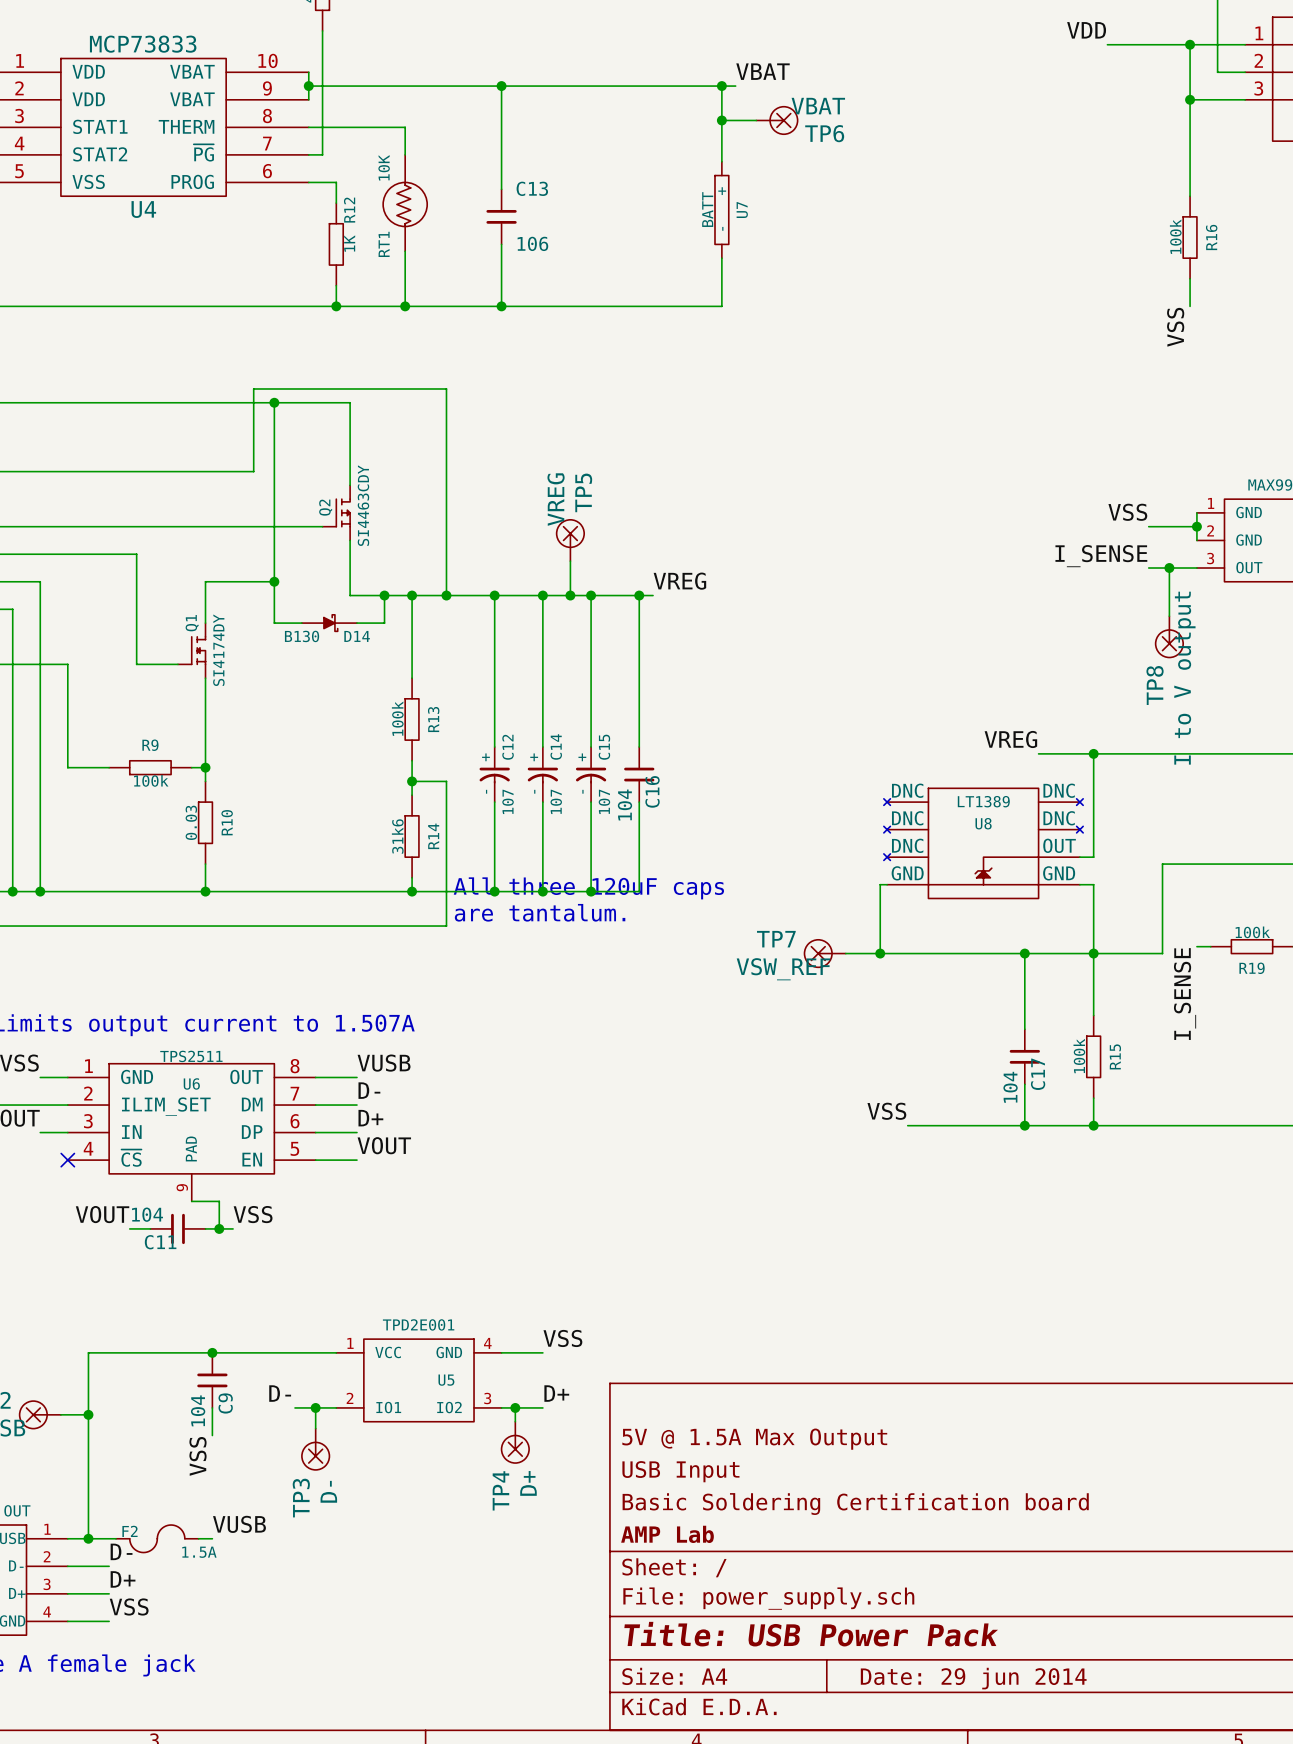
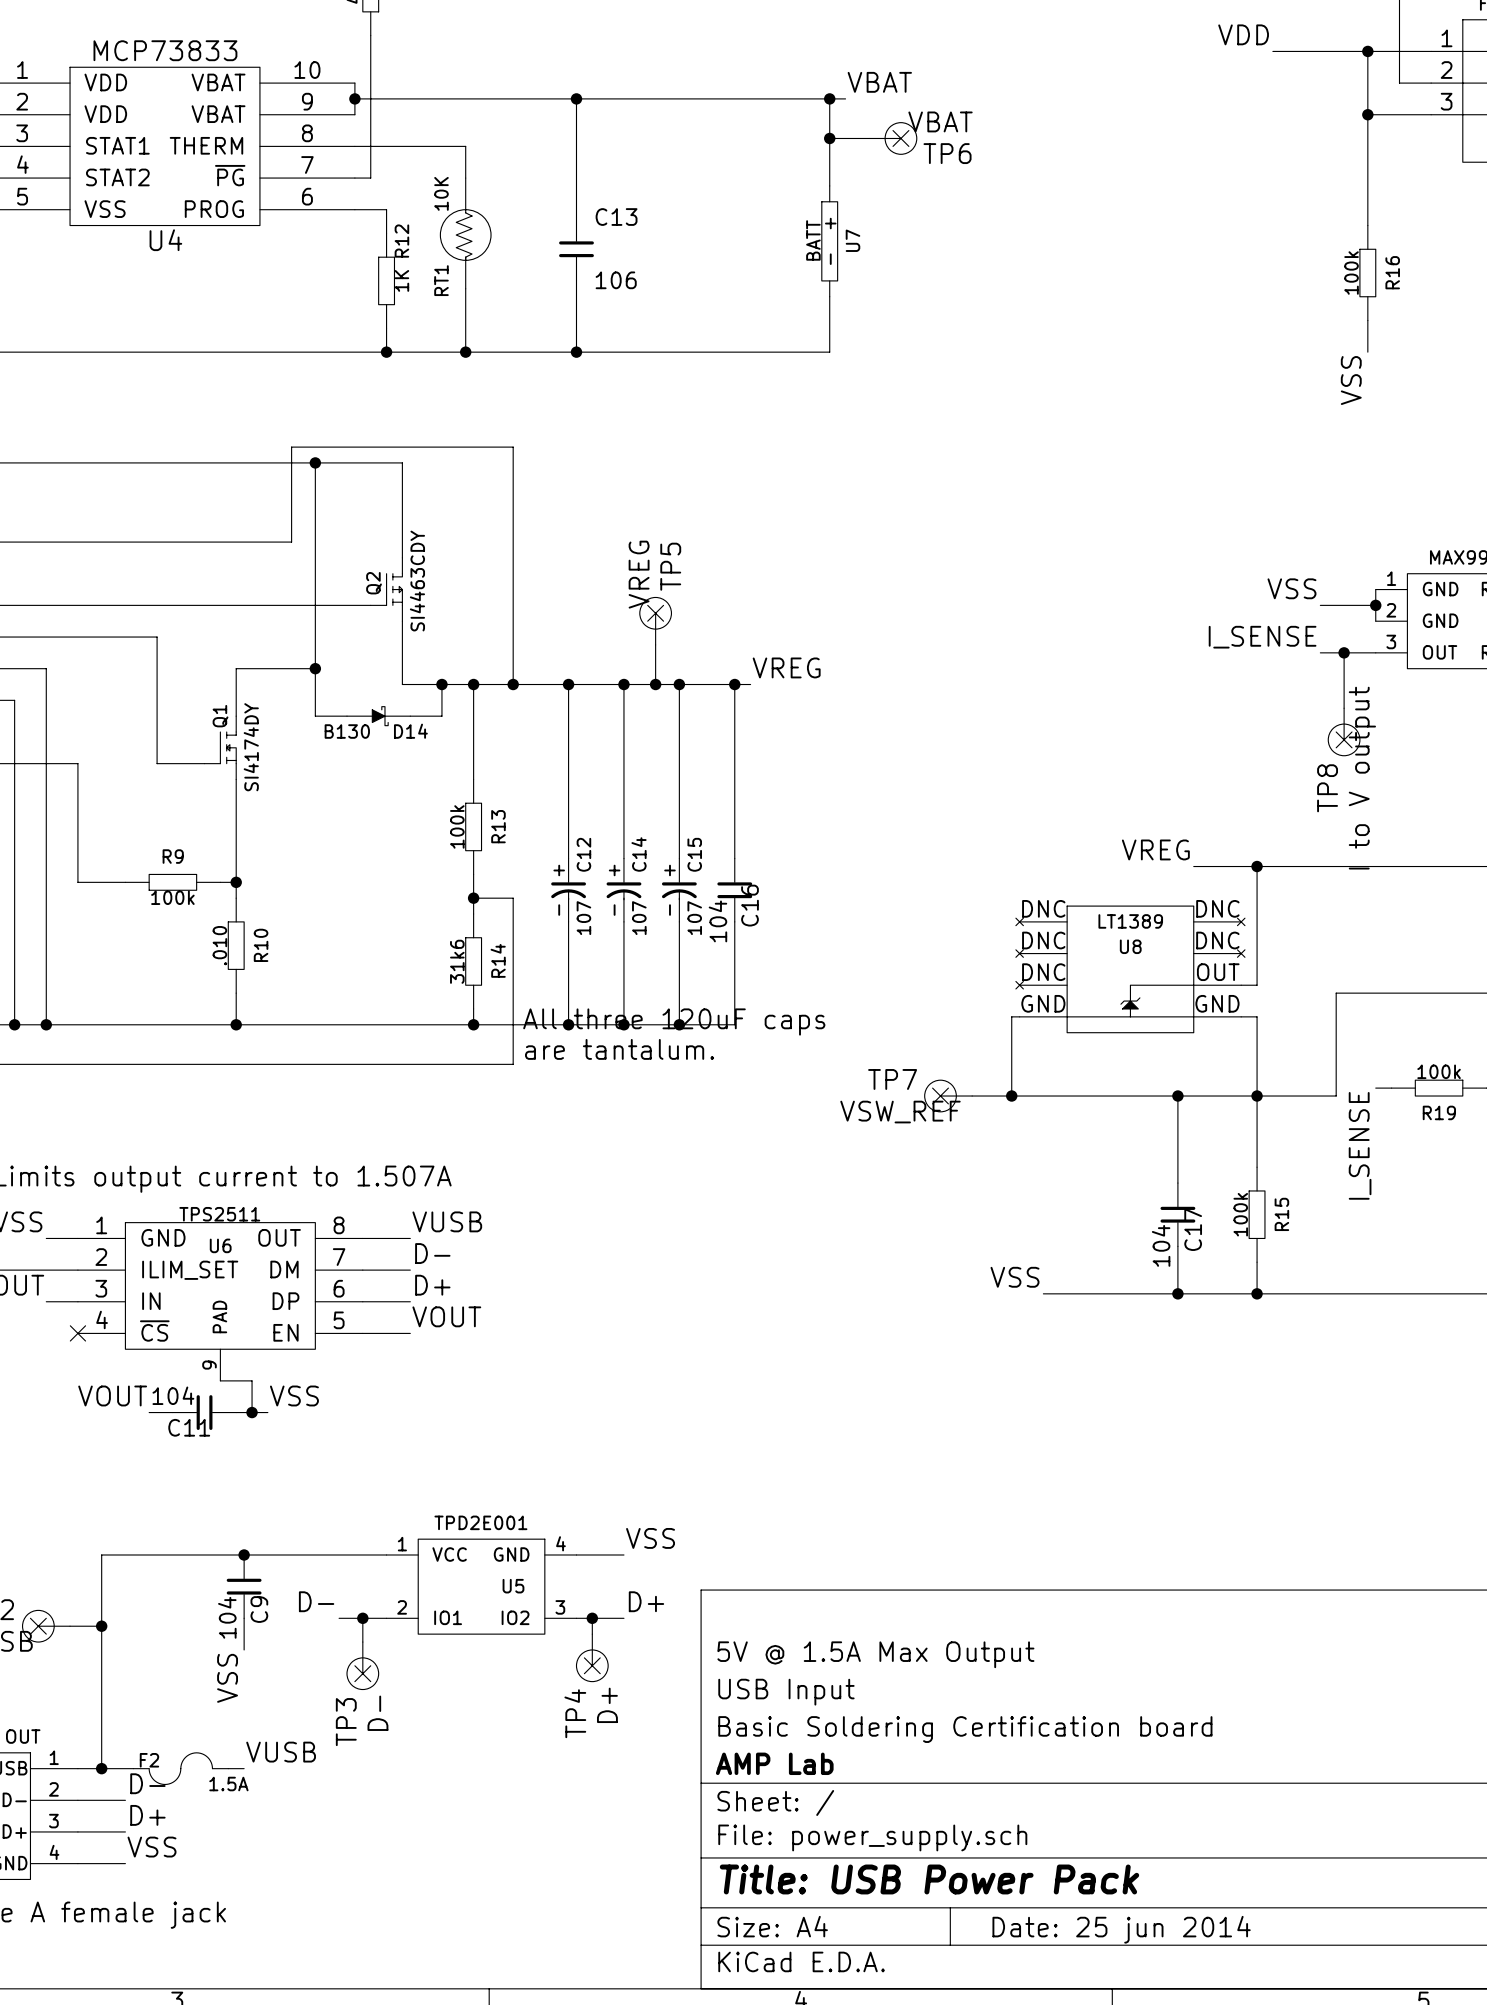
R10 value: 0.03 (191, 822) -> .010 (219, 945)
title block: Date: 29 jun 2014 (973, 1678) -> Date: 25 jun 2014 (1121, 1929)

